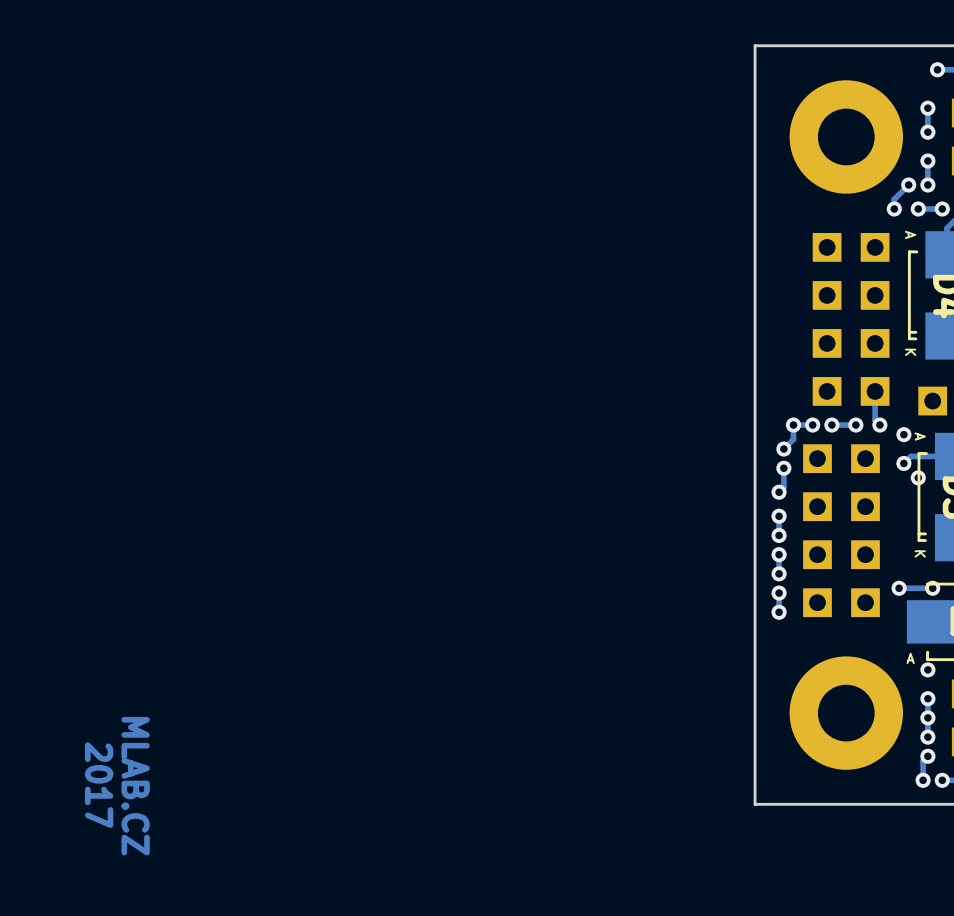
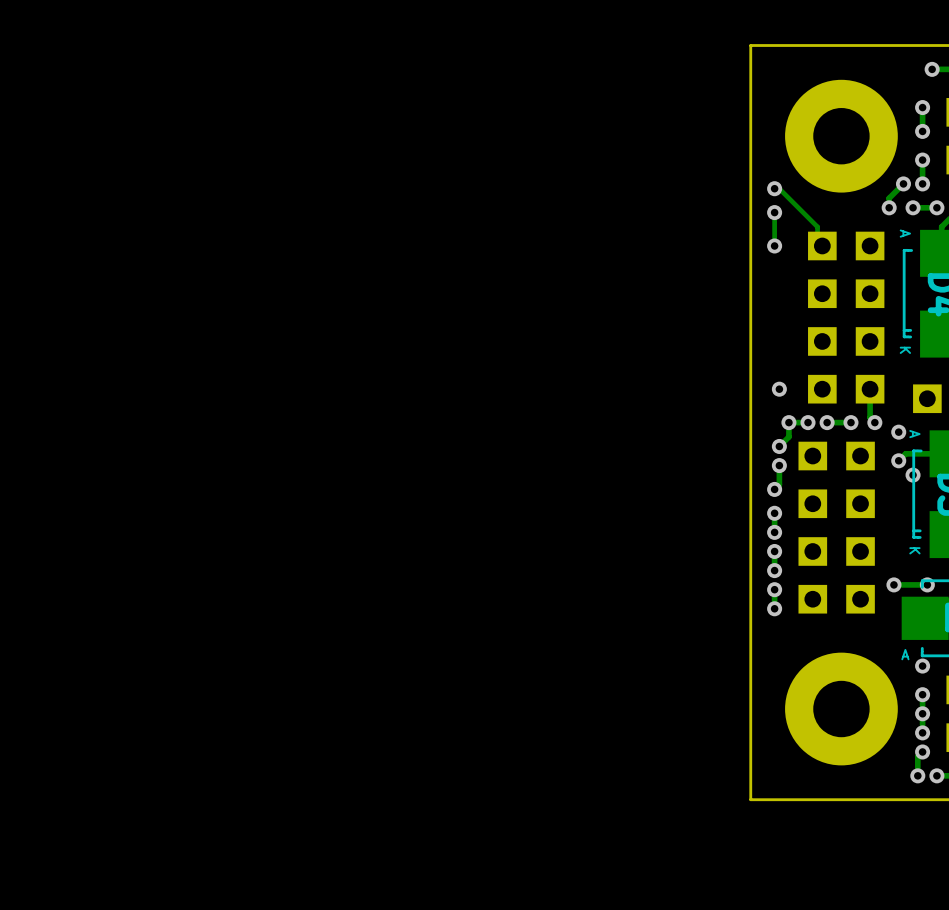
track: none -> (774, 188) (779, 188) (817, 226) (817, 245)
via: none -> (774, 188)
track: none -> (774, 212) (774, 245)
via: none -> (774, 212)
via: none -> (774, 245)
via: none -> (779, 389)
text: 2017 (99, 785) -> none
text: MLAB.CZ (135, 786) -> none

